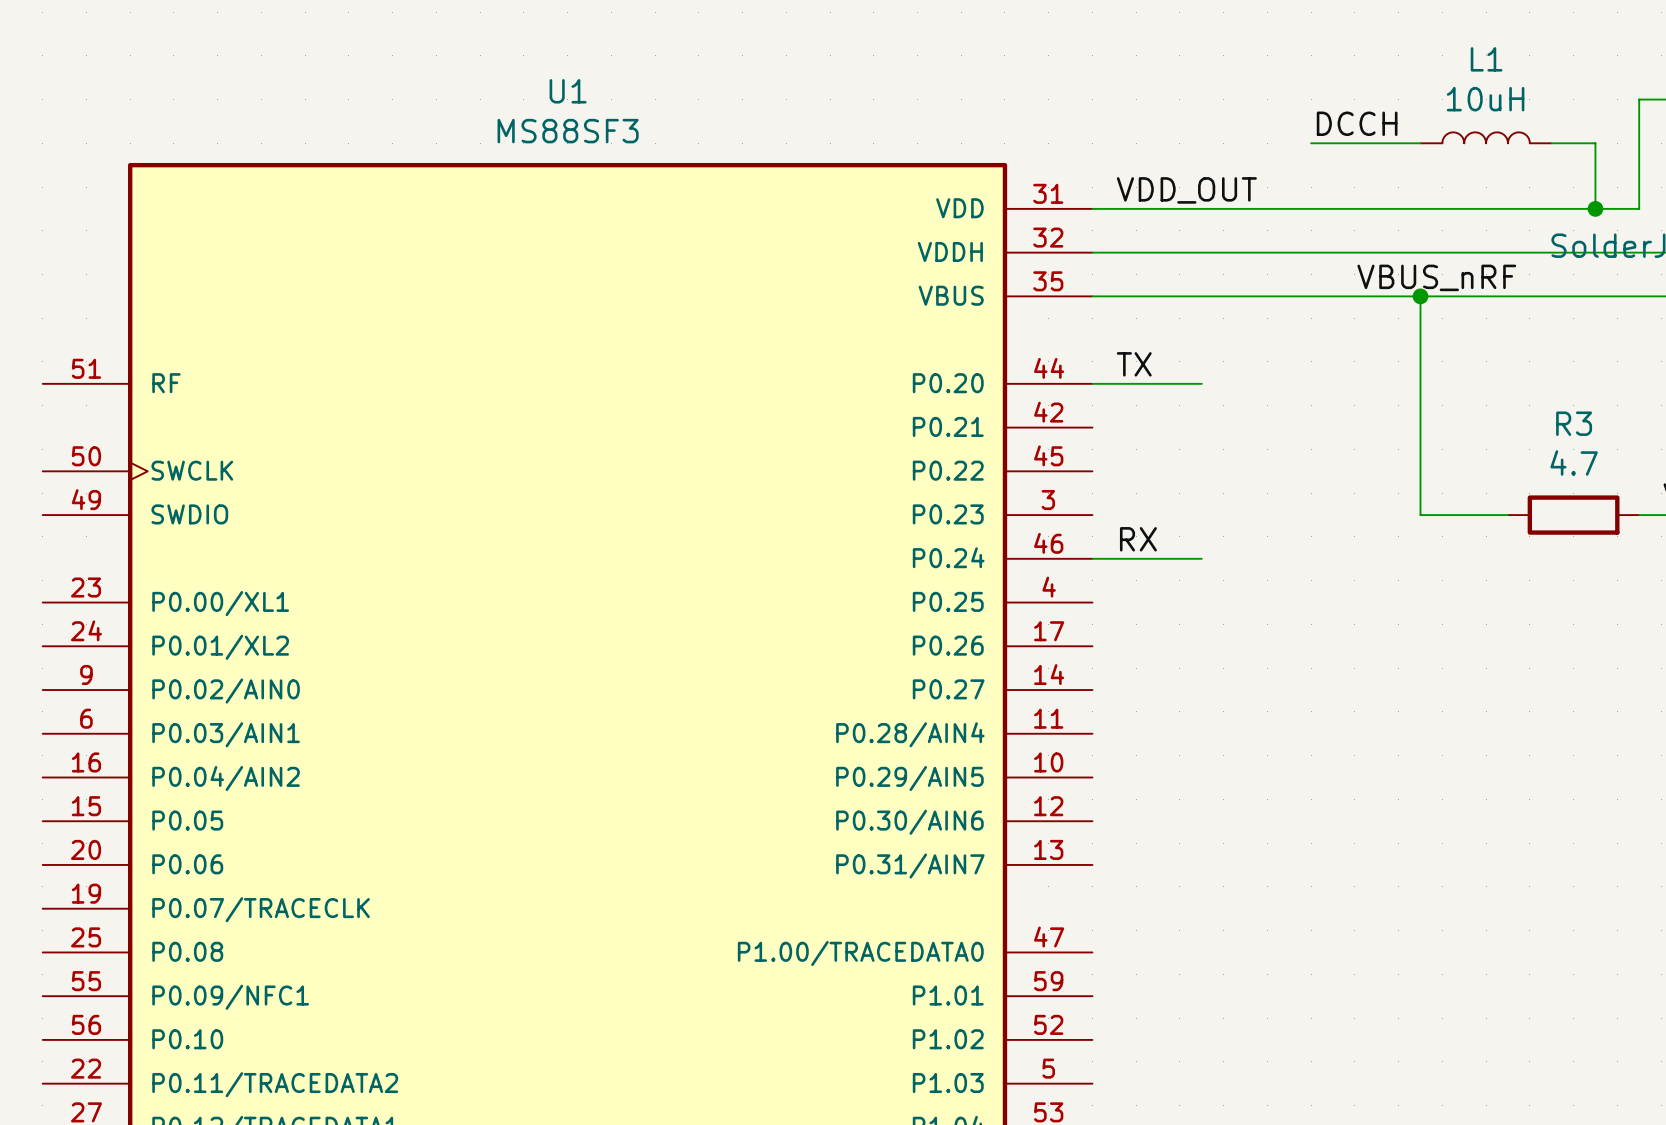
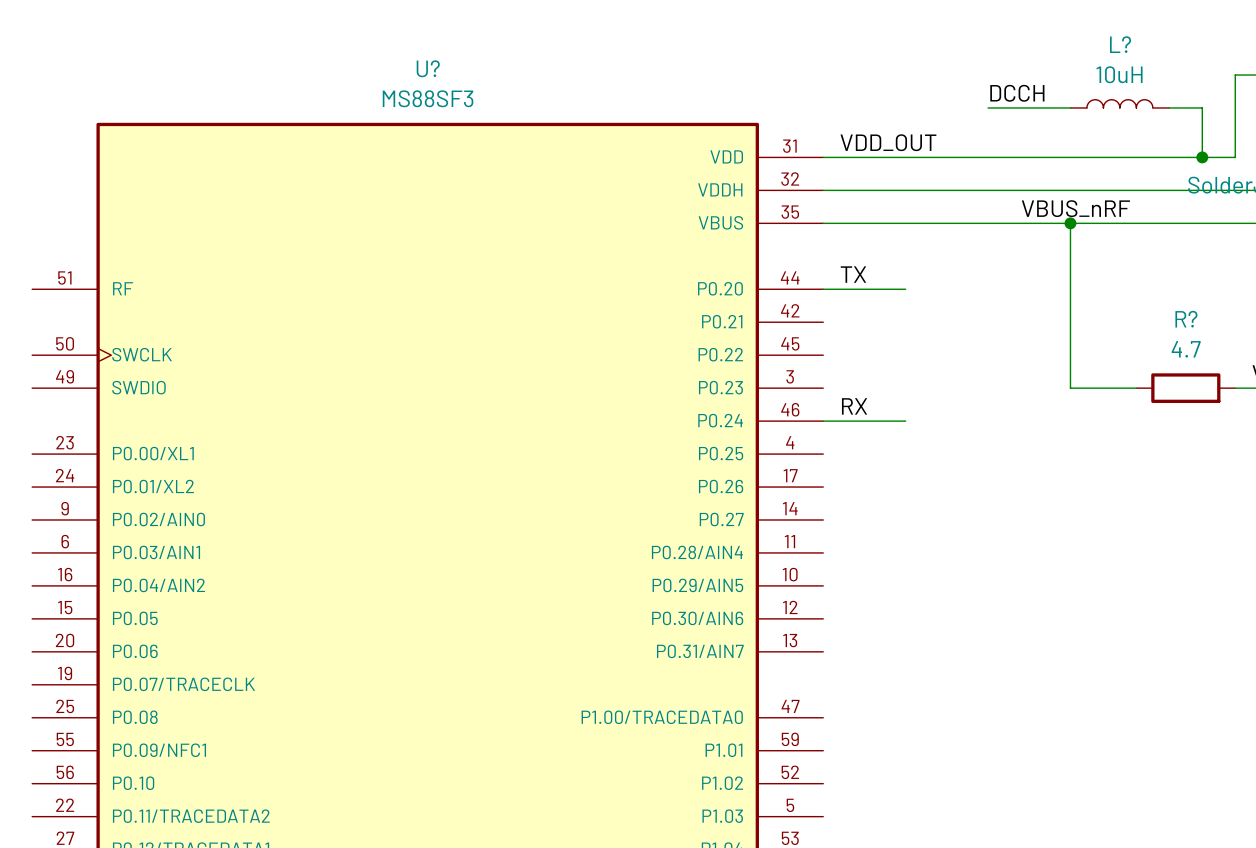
L1 name: L1 (1486, 59) -> L? (1120, 44)
U1 name: U1 (568, 91) -> U? (428, 68)
R3 name: R3 (1574, 423) -> R? (1186, 319)

